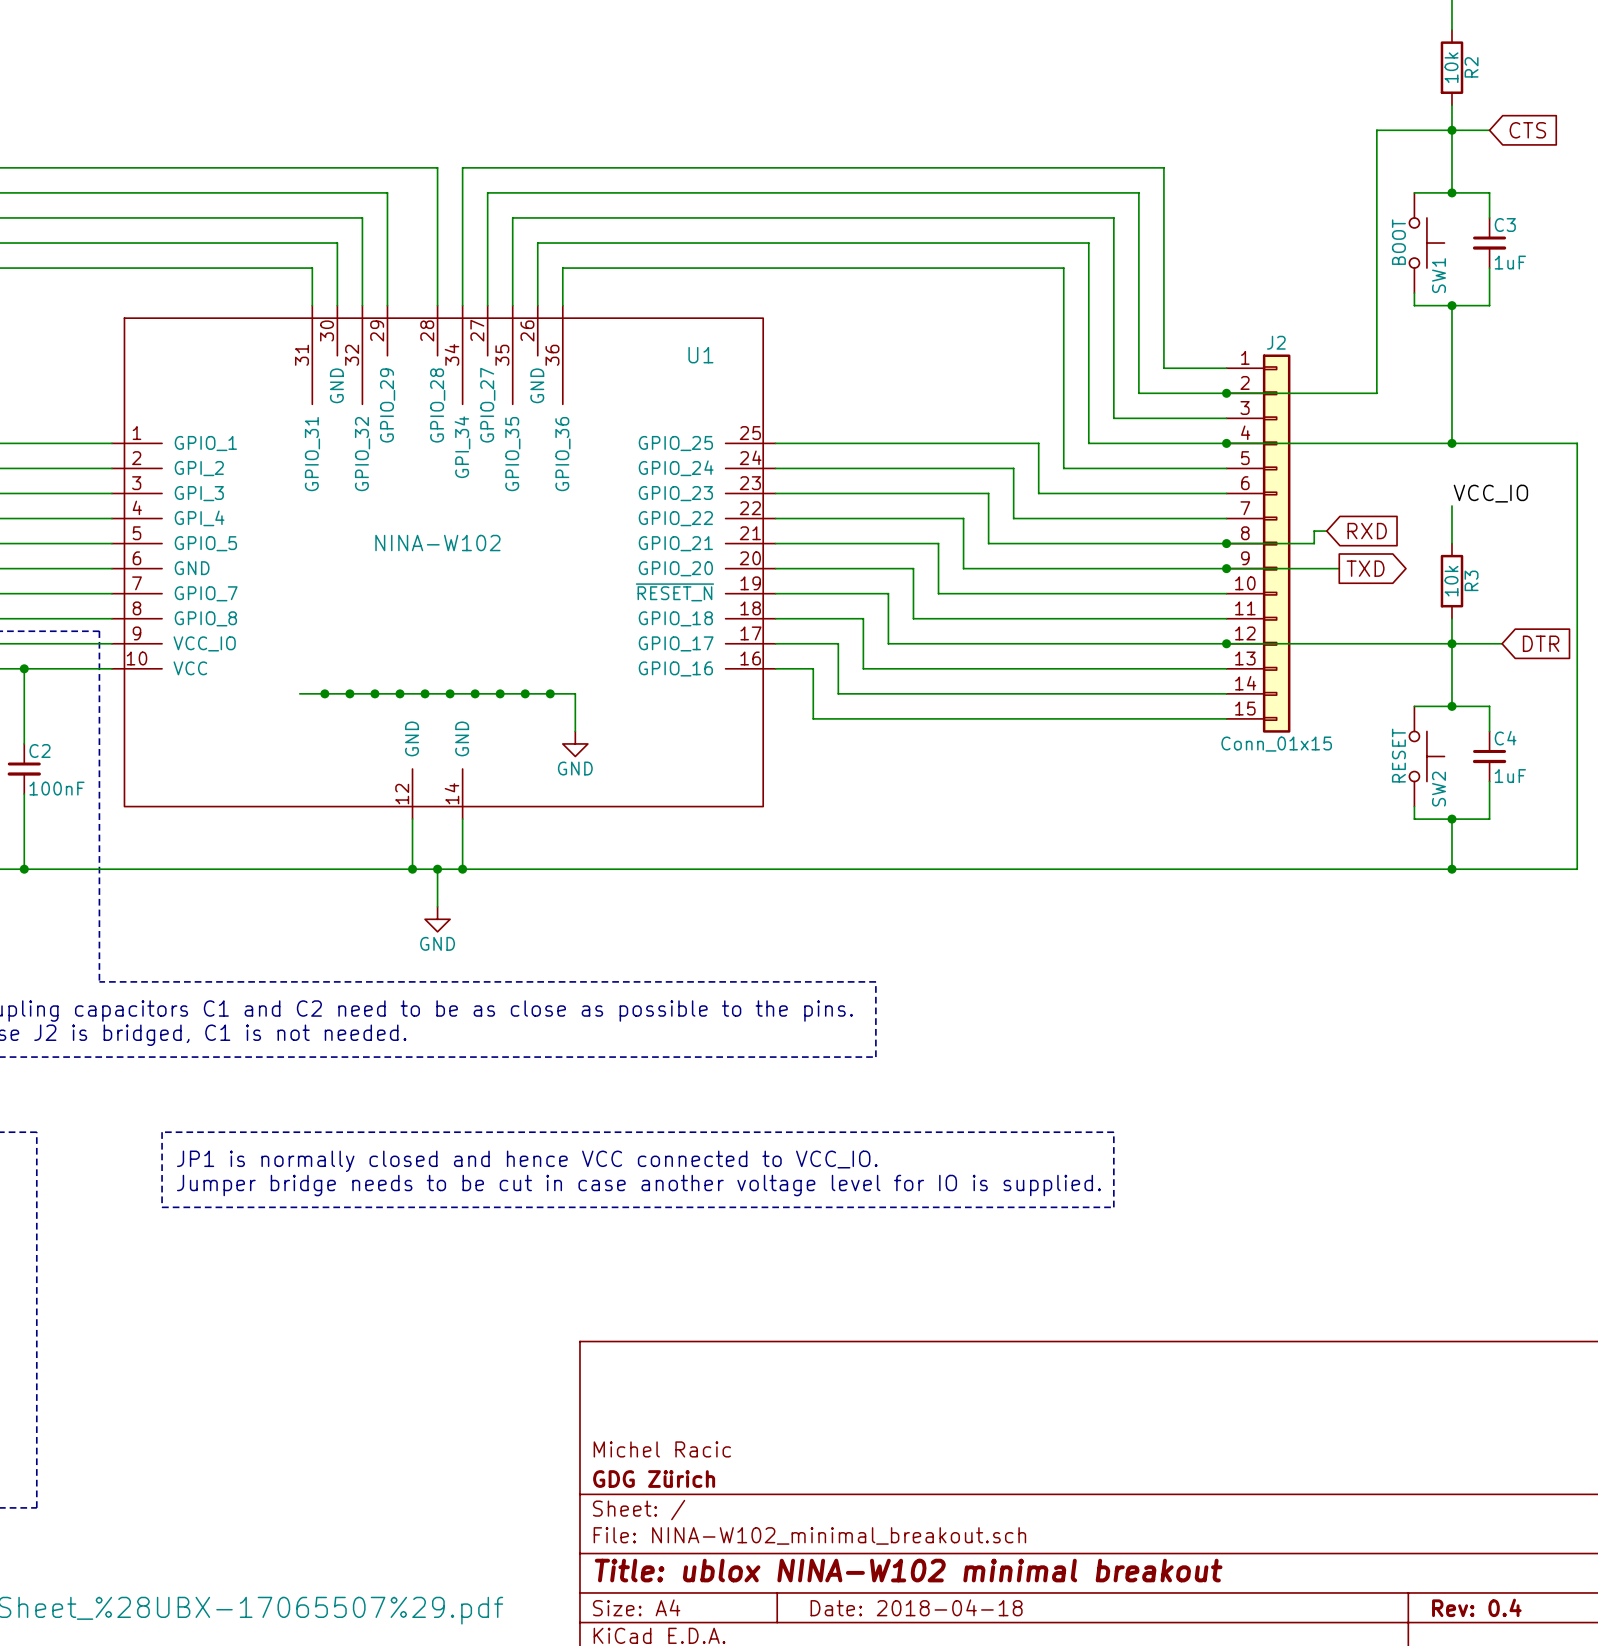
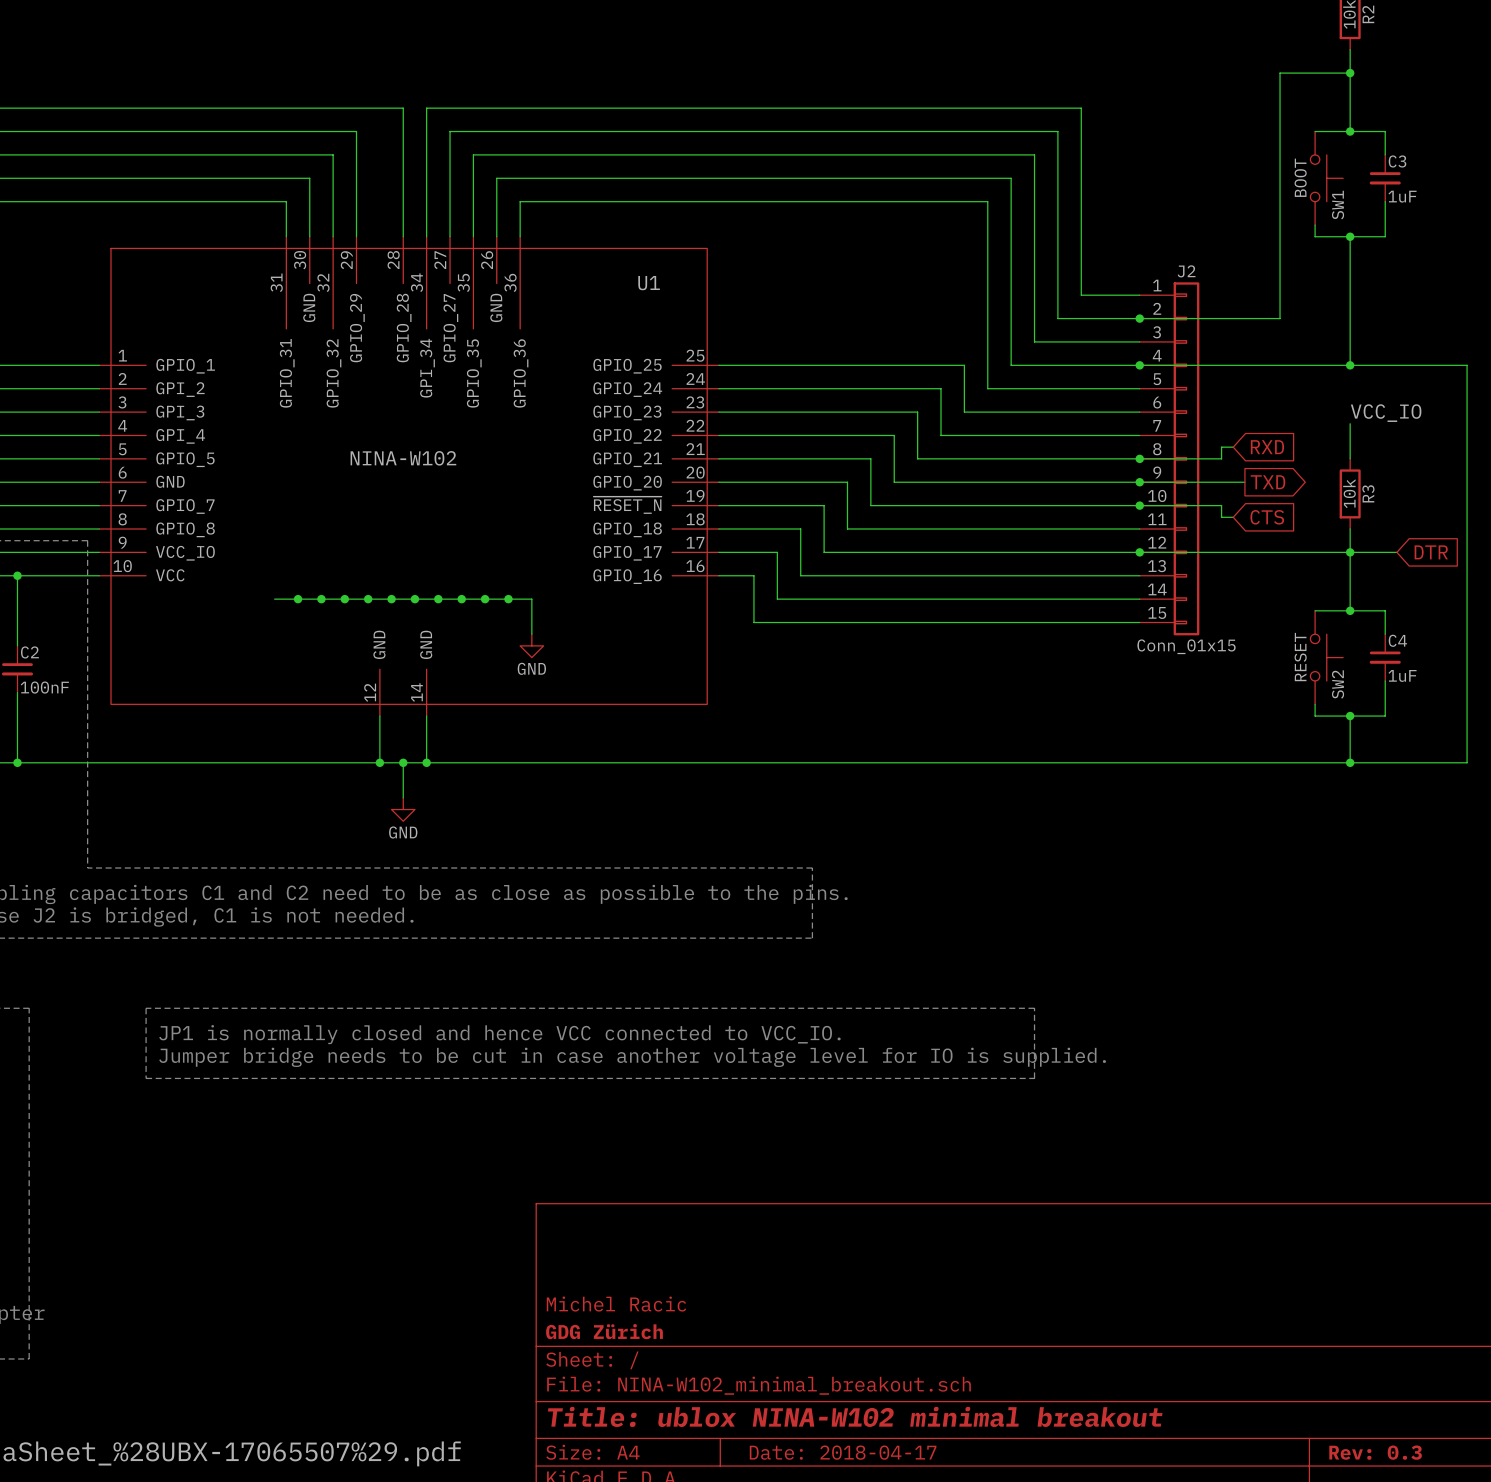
wire: (1451, 130) (1489, 130) -> none
global label: CTS (1527, 130) -> none
wire: none -> (1139, 505) (1221, 505) (1221, 517) (1233, 517)
junction: none -> (1139, 505)
global label: none -> CTS (1267, 517)
title block: Date: 2018-04-18 (916, 1607) -> Date: 2018-04-17 (843, 1452)
title block: Rev: 0.4 (1476, 1607) -> Rev: 0.3 (1375, 1452)

